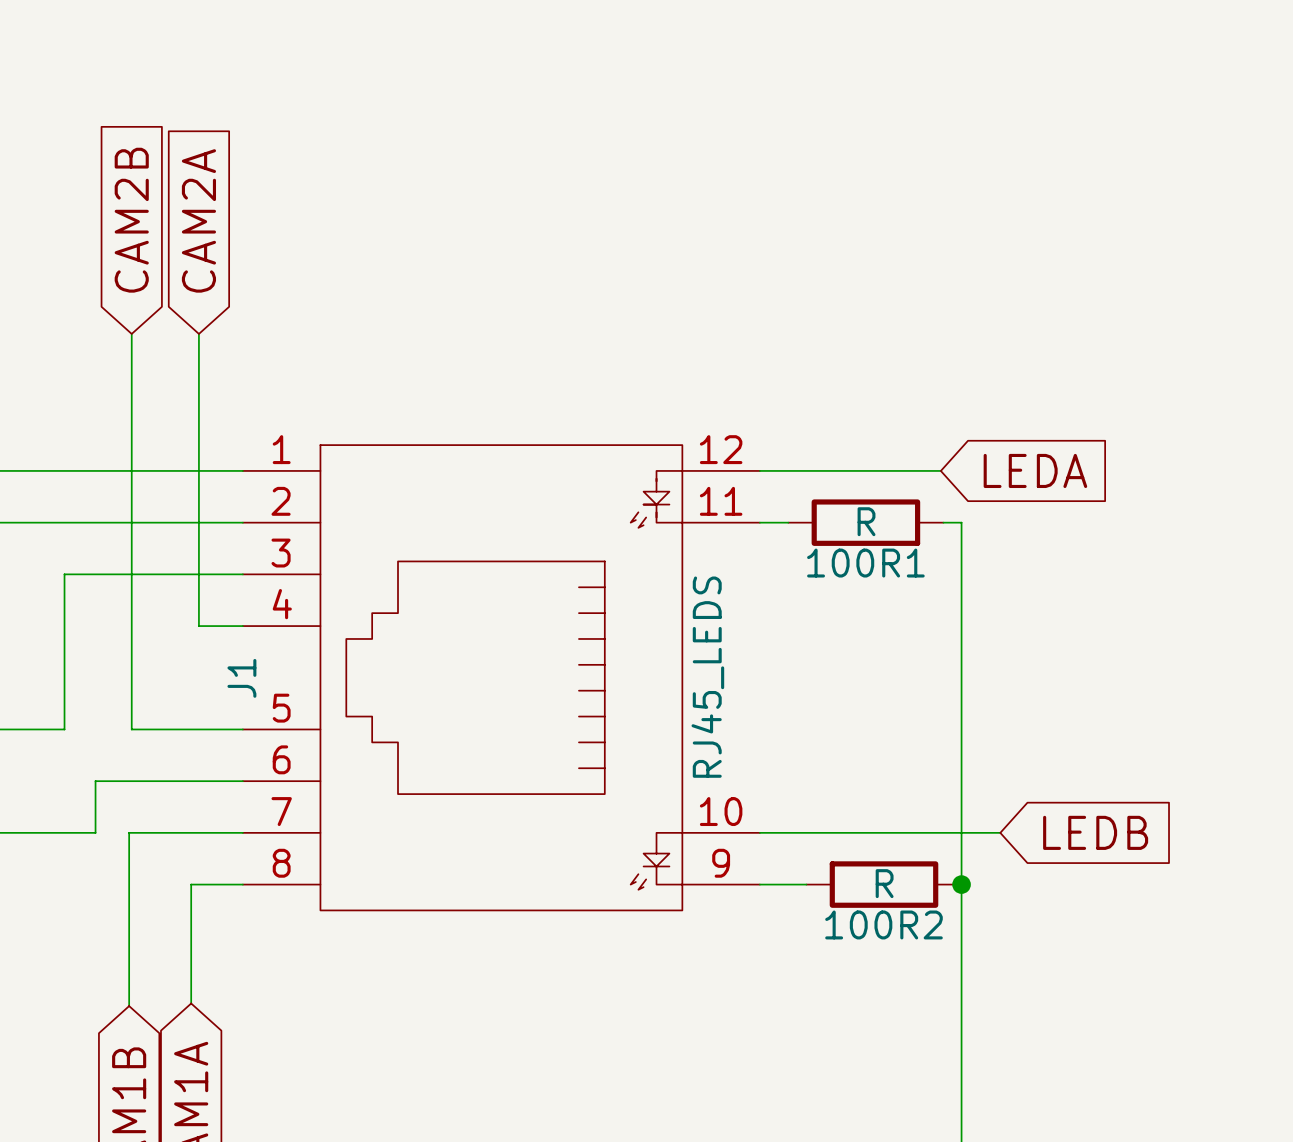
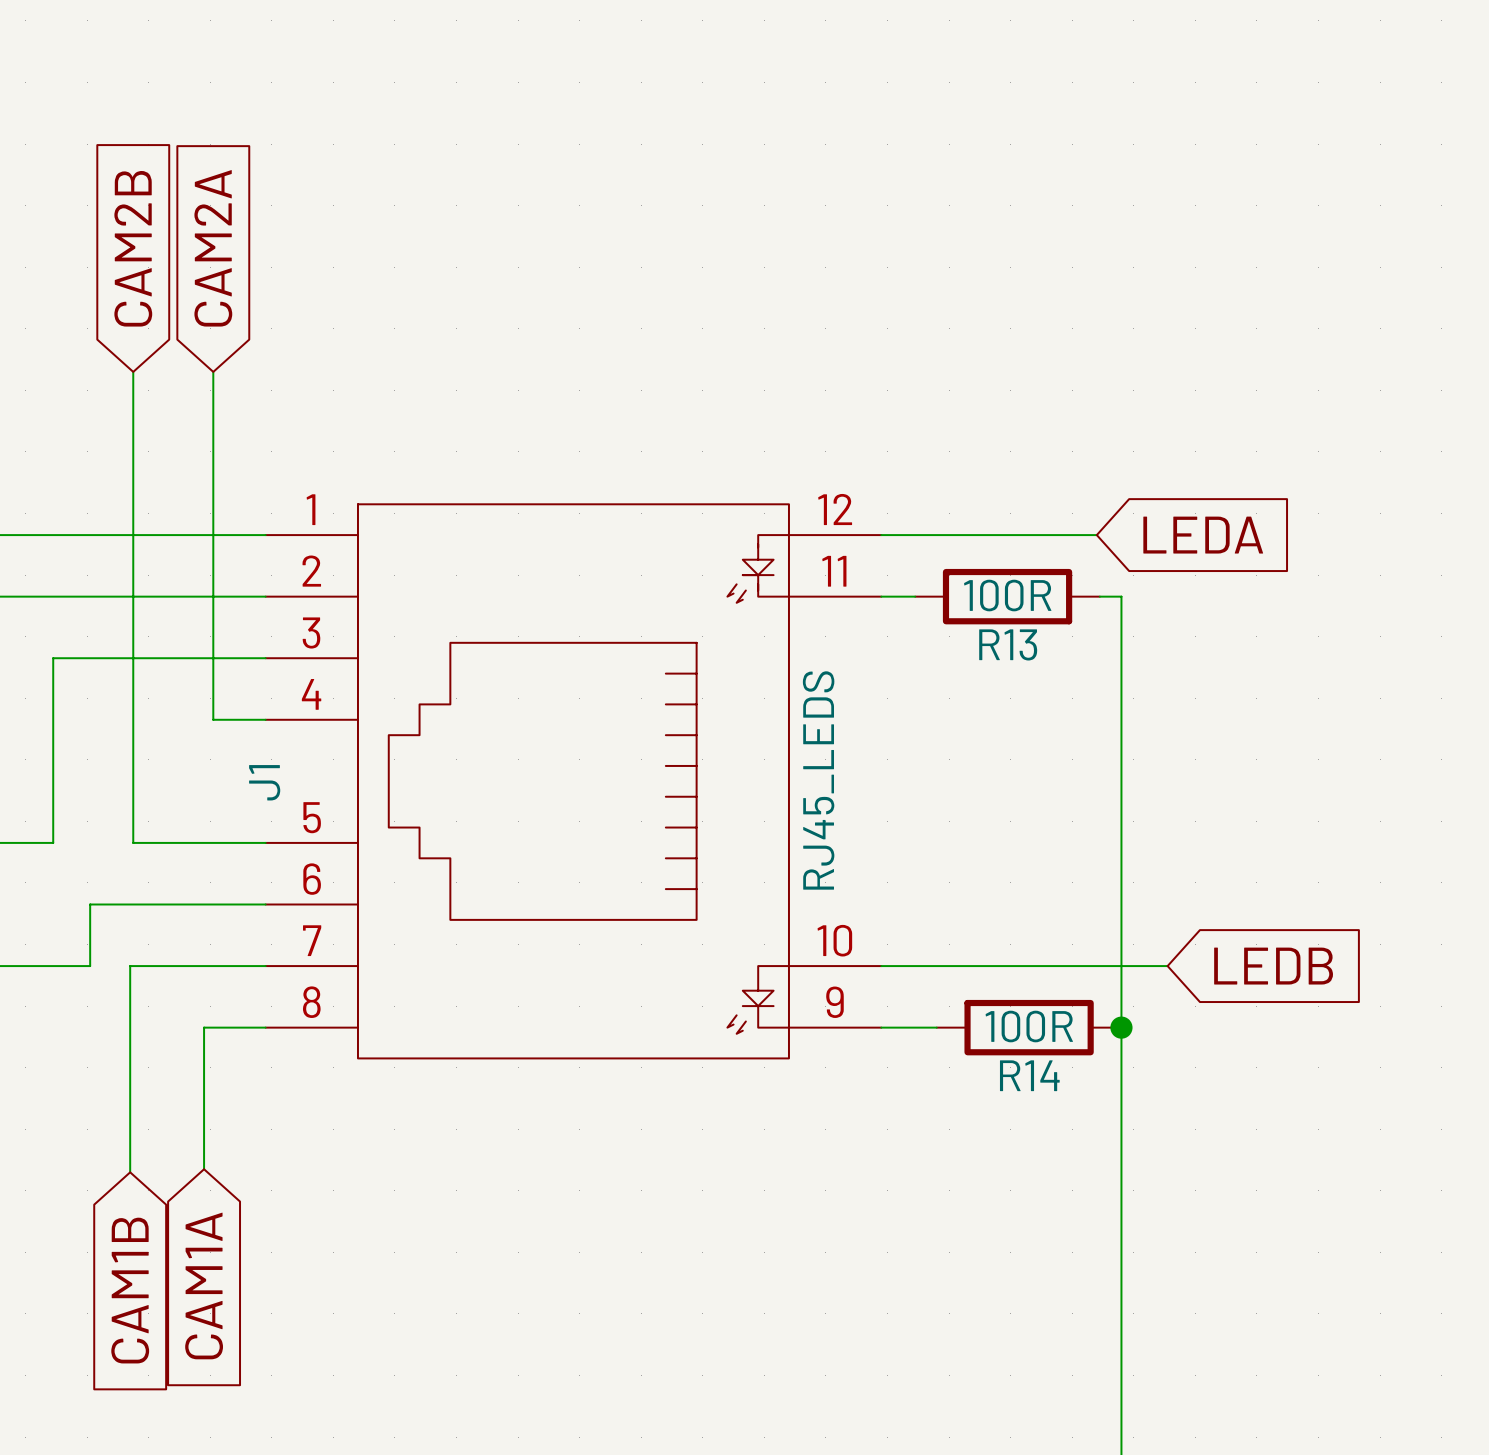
100R1 value: R (866, 521) -> 100R (1007, 595)
100R1 name: 100R1 (865, 563) -> R13 (1008, 644)
100R2 value: R (884, 883) -> 100R (1029, 1026)
100R2 name: 100R2 (884, 924) -> R14 (1029, 1075)

